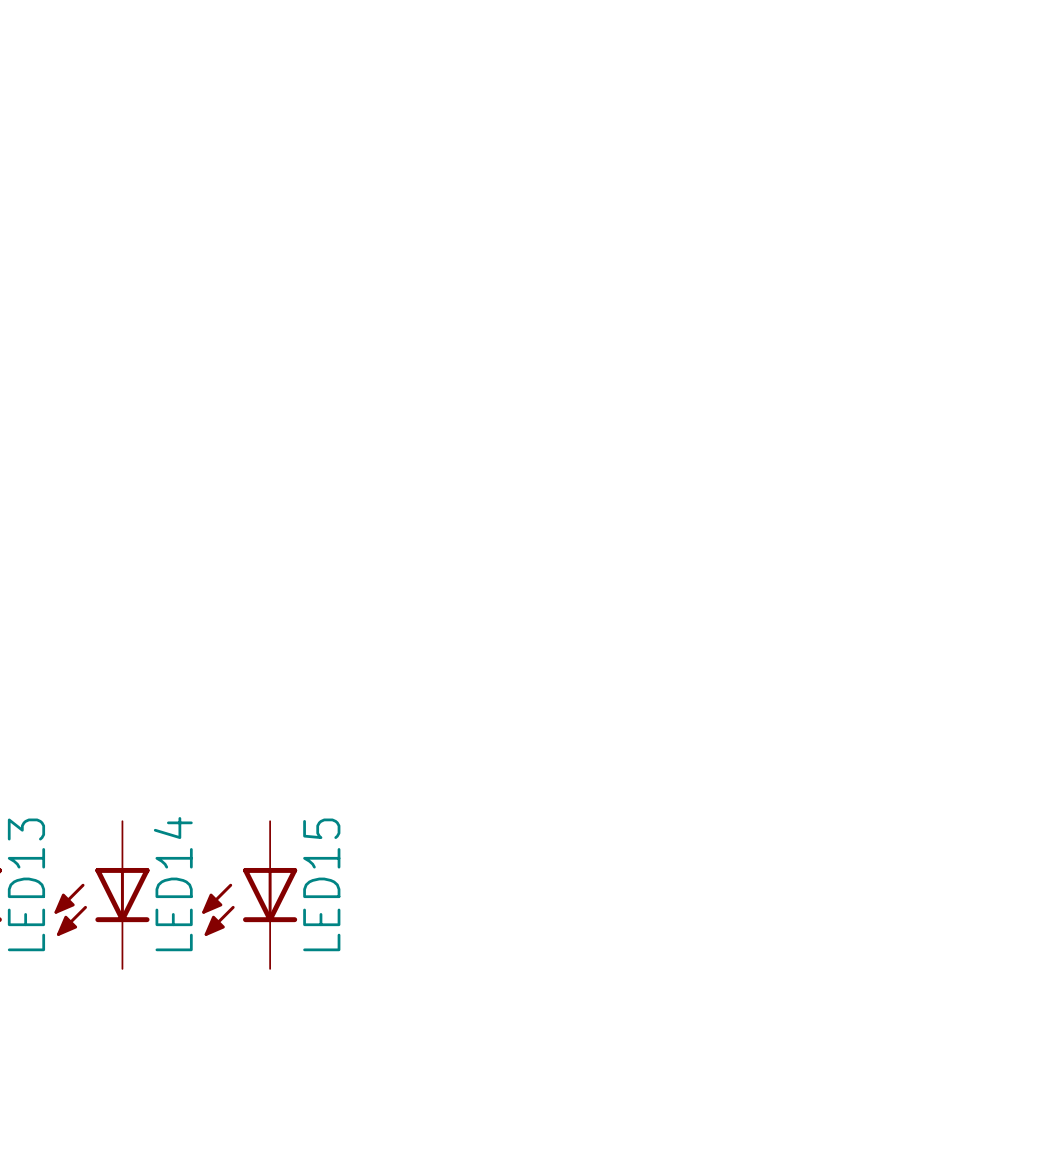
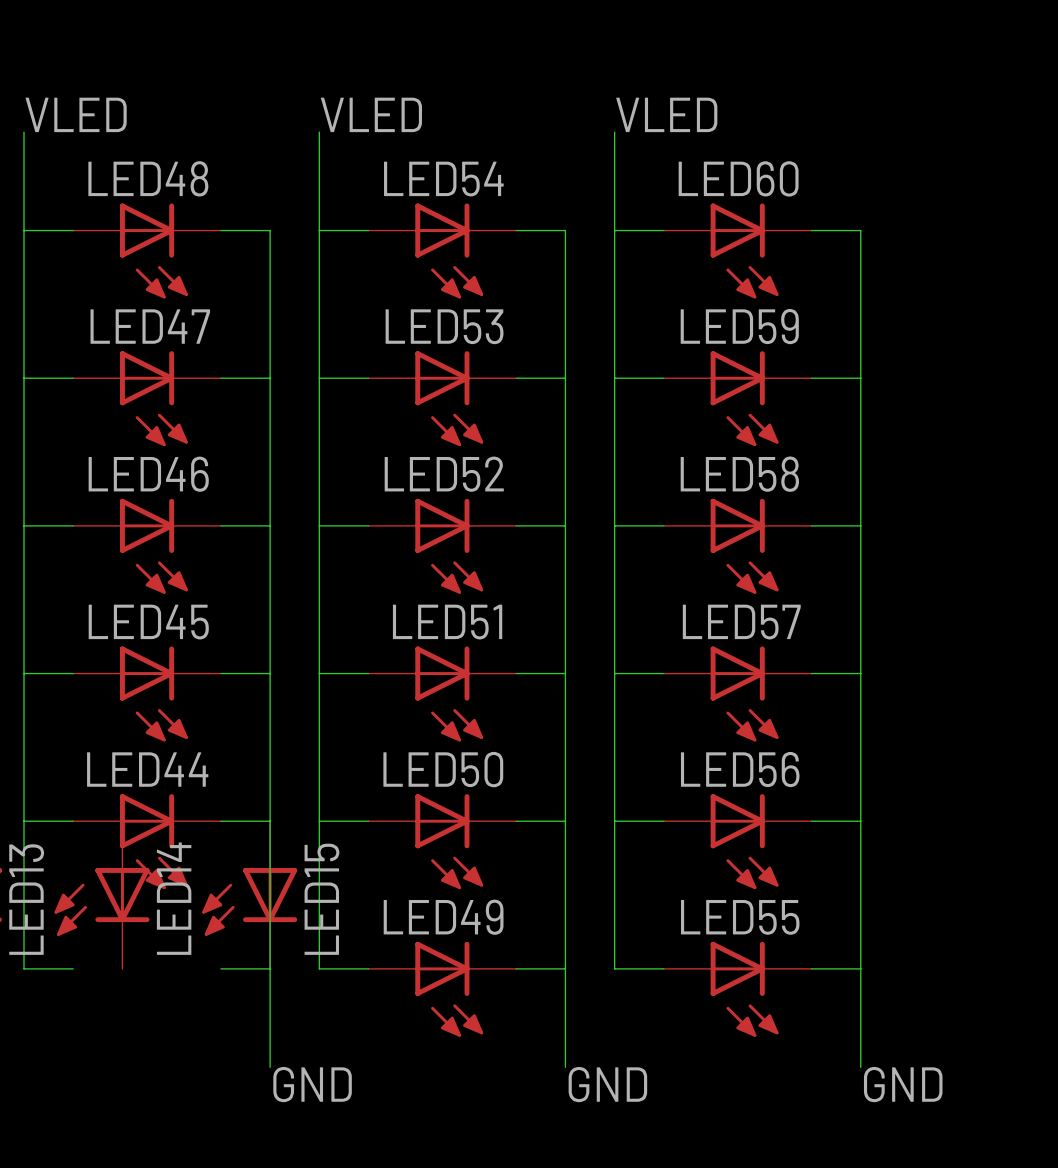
label: none -> VLED (76, 114)
label: none -> VLED (371, 114)
label: none -> VLED (666, 114)
wire: none -> (23, 132) (23, 968) (73, 968)
wire: none -> (319, 132) (319, 968) (368, 968)
wire: none -> (614, 132) (614, 968) (663, 968)
wire: none -> (23, 230) (73, 230)
wire: none -> (220, 230) (270, 230) (270, 1067)
wire: none -> (319, 230) (368, 230)
wire: none -> (516, 230) (565, 230) (565, 1067)
wire: none -> (614, 230) (663, 230)
wire: none -> (811, 230) (860, 230) (860, 1067)
LED48: none -> (147, 250)
LED54: none -> (442, 250)
LED60: none -> (737, 250)
wire: none -> (23, 378) (73, 378)
wire: none -> (220, 378) (270, 378)
wire: none -> (319, 378) (368, 378)
wire: none -> (516, 378) (565, 378)
wire: none -> (614, 378) (663, 378)
wire: none -> (811, 378) (860, 378)
LED47: none -> (147, 398)
LED53: none -> (442, 398)
LED59: none -> (737, 398)
wire: none -> (23, 525) (73, 525)
wire: none -> (220, 525) (270, 525)
wire: none -> (319, 525) (368, 525)
wire: none -> (516, 525) (565, 525)
wire: none -> (614, 525) (663, 525)
wire: none -> (811, 525) (860, 525)
LED46: none -> (147, 546)
LED52: none -> (442, 546)
LED58: none -> (737, 546)
wire: none -> (23, 673) (73, 673)
wire: none -> (220, 673) (270, 673)
wire: none -> (319, 673) (368, 673)
wire: none -> (516, 673) (565, 673)
wire: none -> (614, 673) (663, 673)
wire: none -> (811, 673) (860, 673)
LED45: none -> (147, 693)
LED51: none -> (442, 693)
LED57: none -> (737, 693)
wire: none -> (23, 821) (73, 821)
wire: none -> (220, 821) (270, 821)
wire: none -> (319, 821) (368, 821)
wire: none -> (516, 821) (565, 821)
wire: none -> (614, 821) (663, 821)
wire: none -> (811, 821) (860, 821)
LED44: none -> (147, 841)
LED50: none -> (442, 841)
LED56: none -> (737, 841)
wire: none -> (220, 968) (270, 968)
wire: none -> (516, 968) (565, 968)
wire: none -> (811, 968) (860, 968)
LED49: none -> (442, 989)
LED55: none -> (737, 989)
label: none -> GND (312, 1084)
label: none -> GND (607, 1084)
label: none -> GND (903, 1084)

